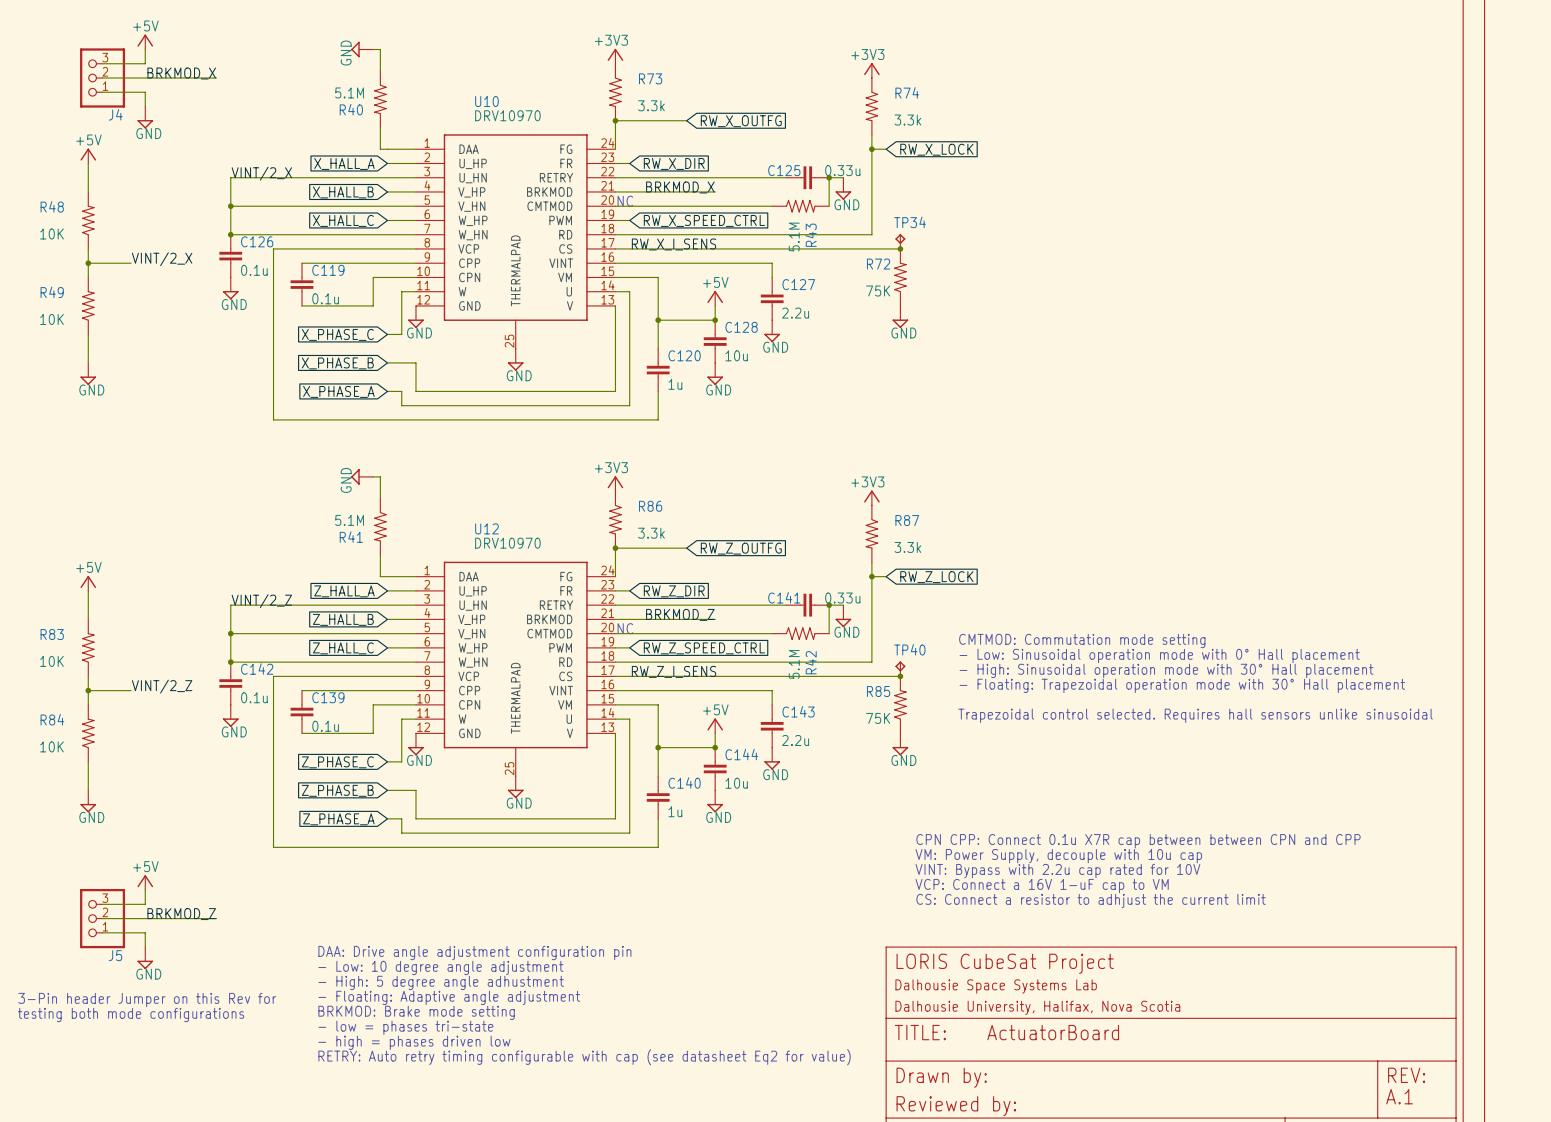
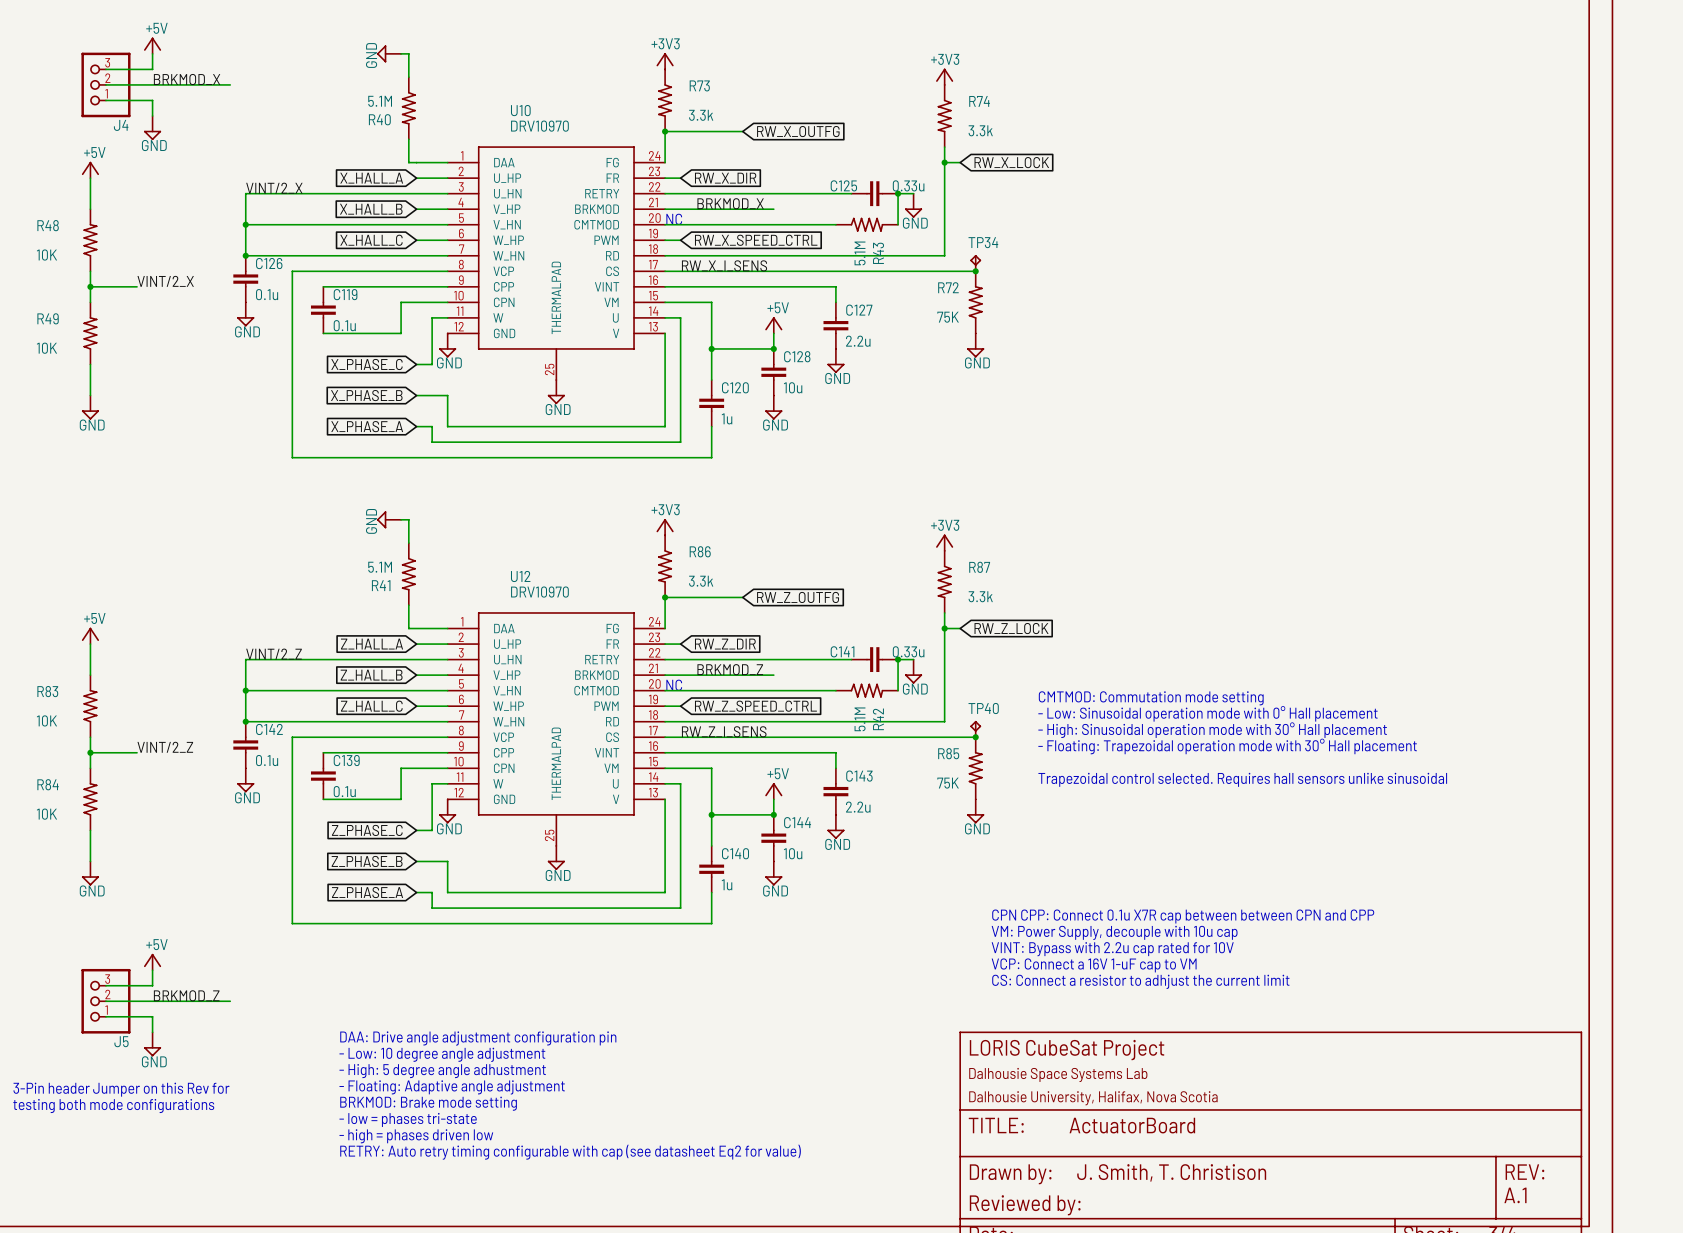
text: none -> J. Smith, T. Christison (1171, 1172)

